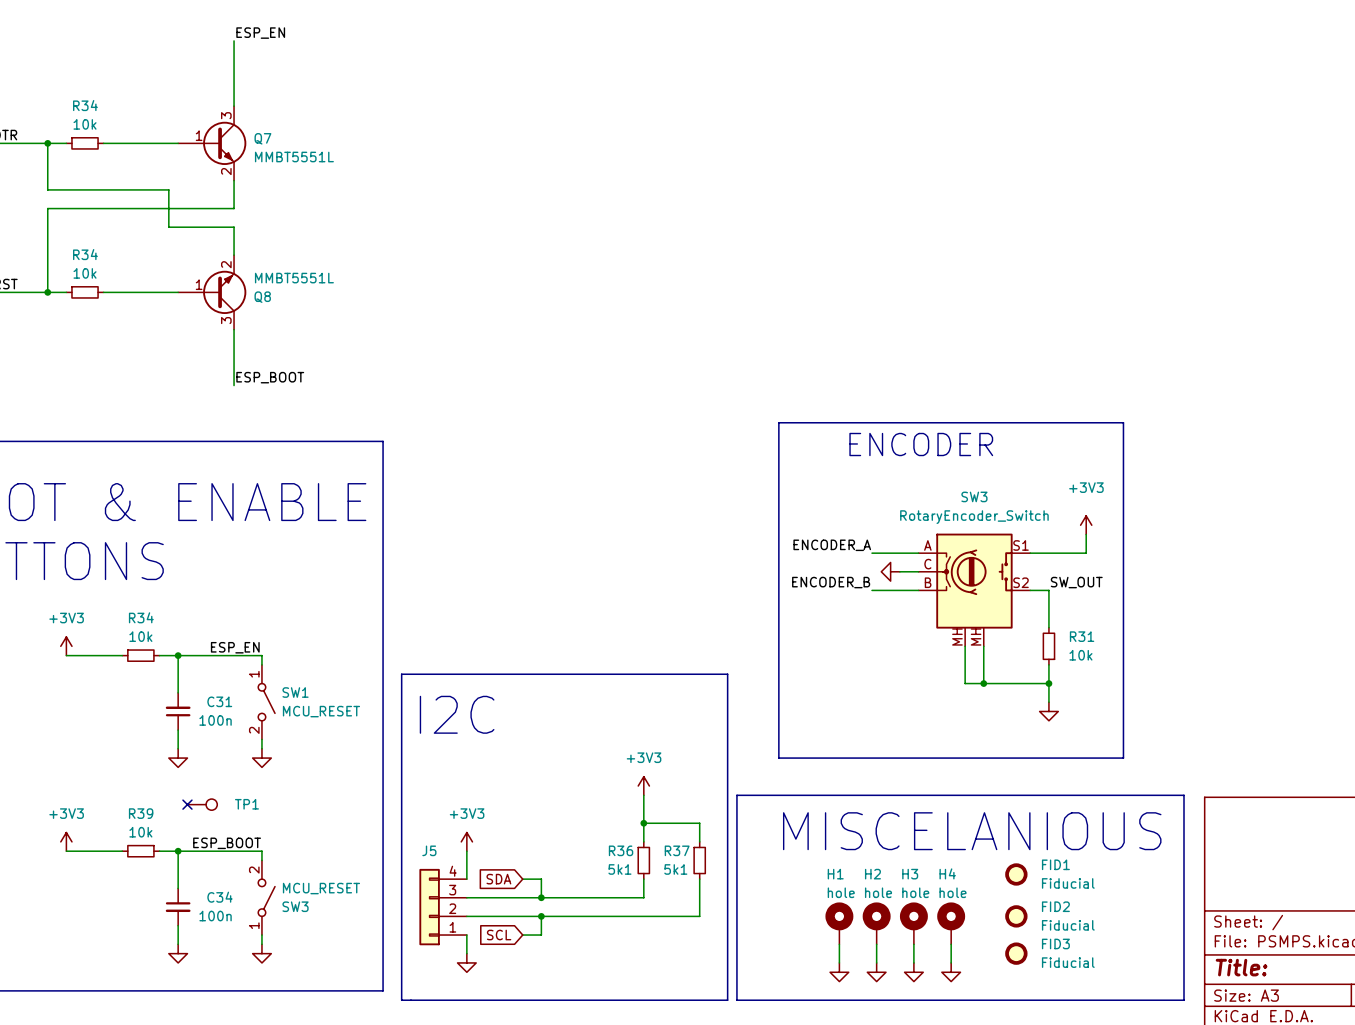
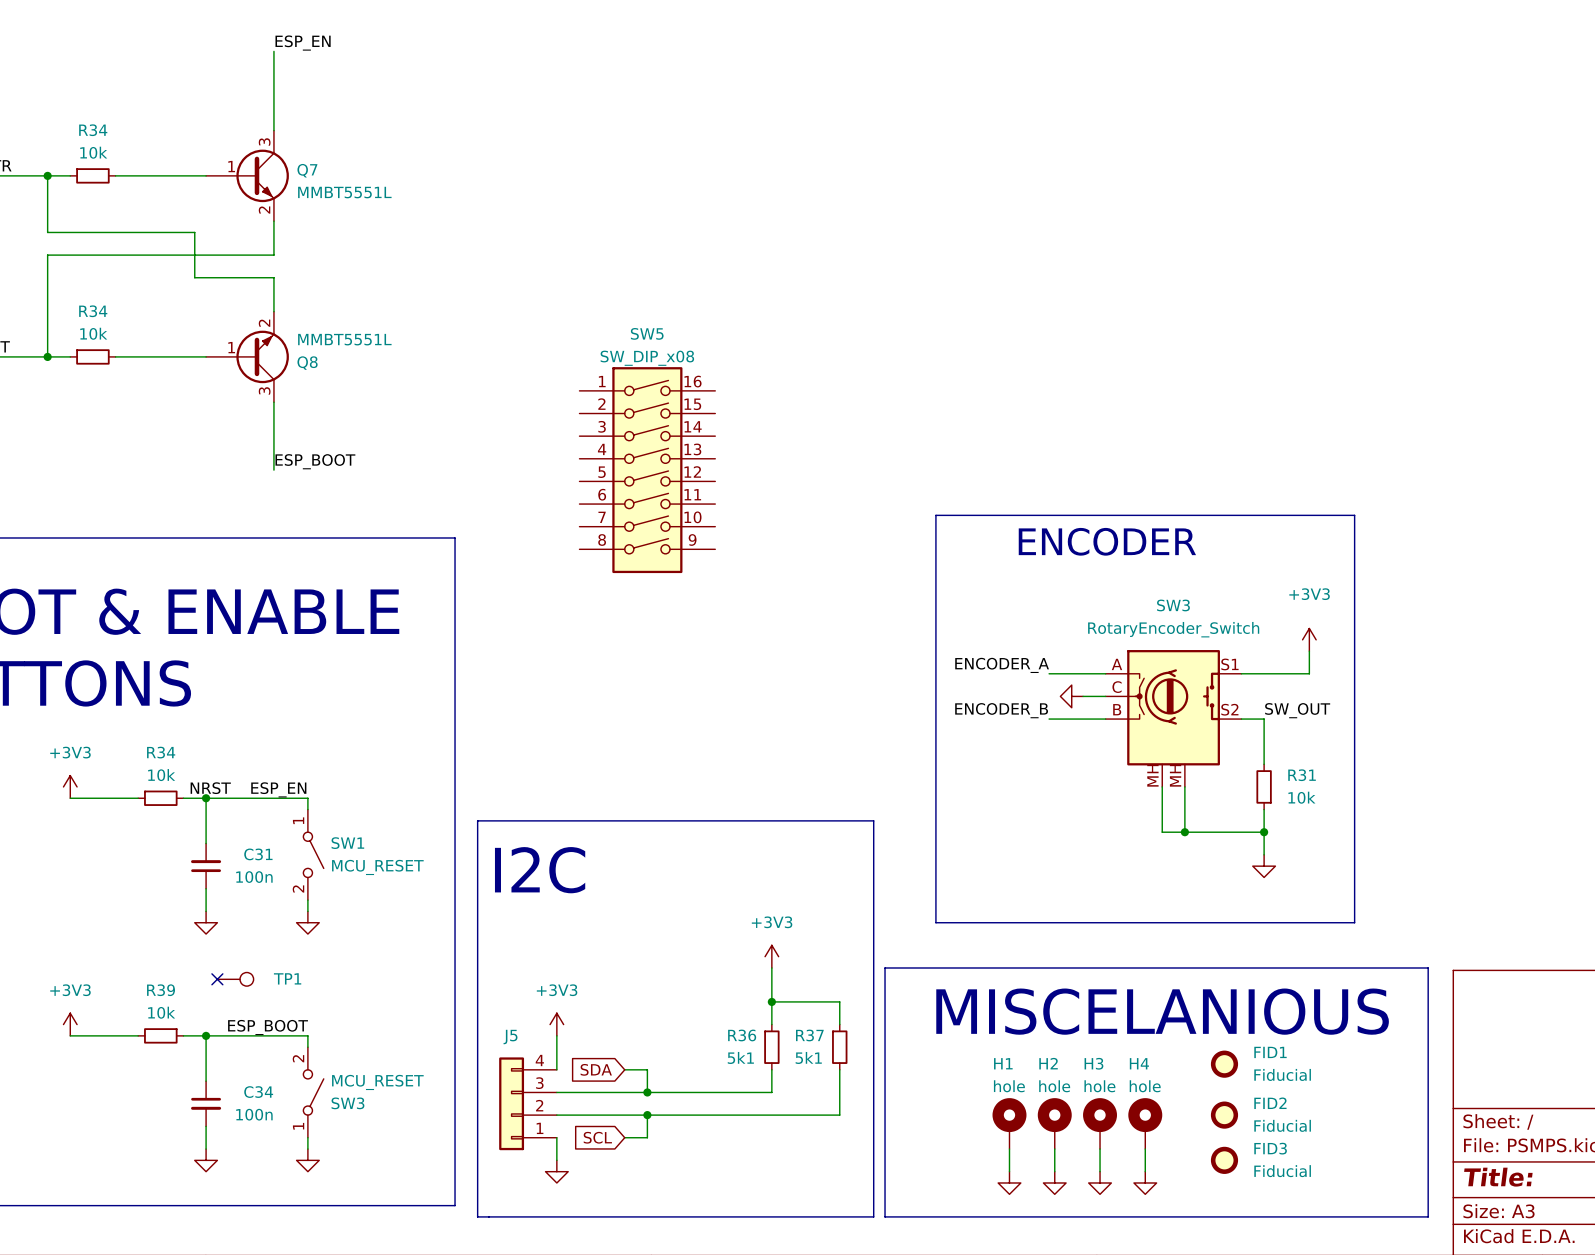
SW5: none -> SW_DIP_x08 (647, 470)
label: none -> NRST (210, 788)

